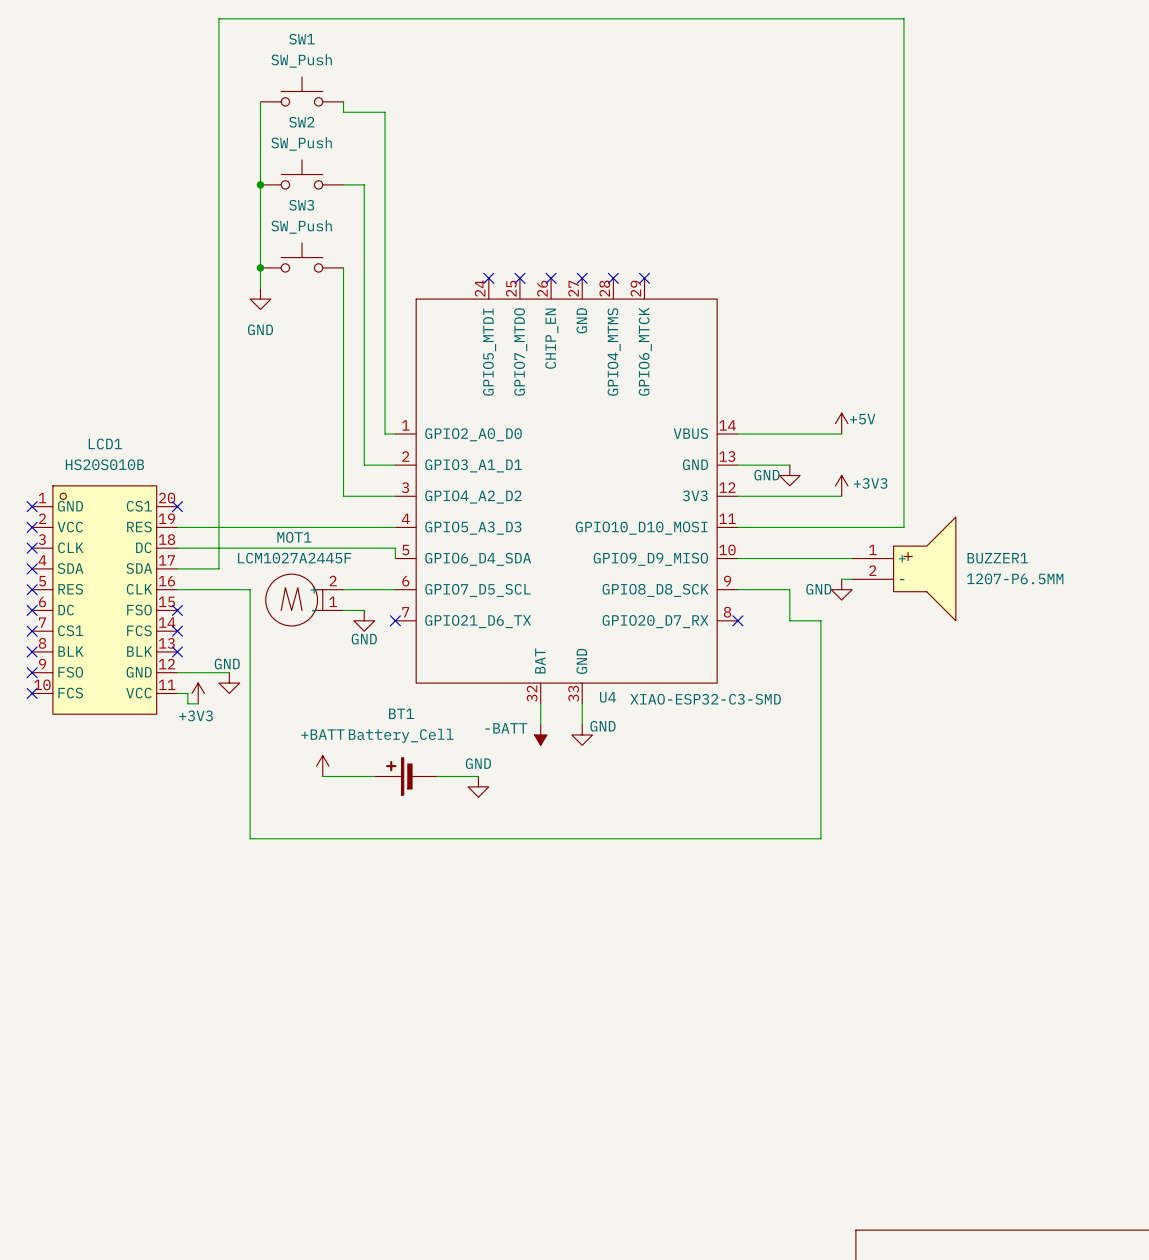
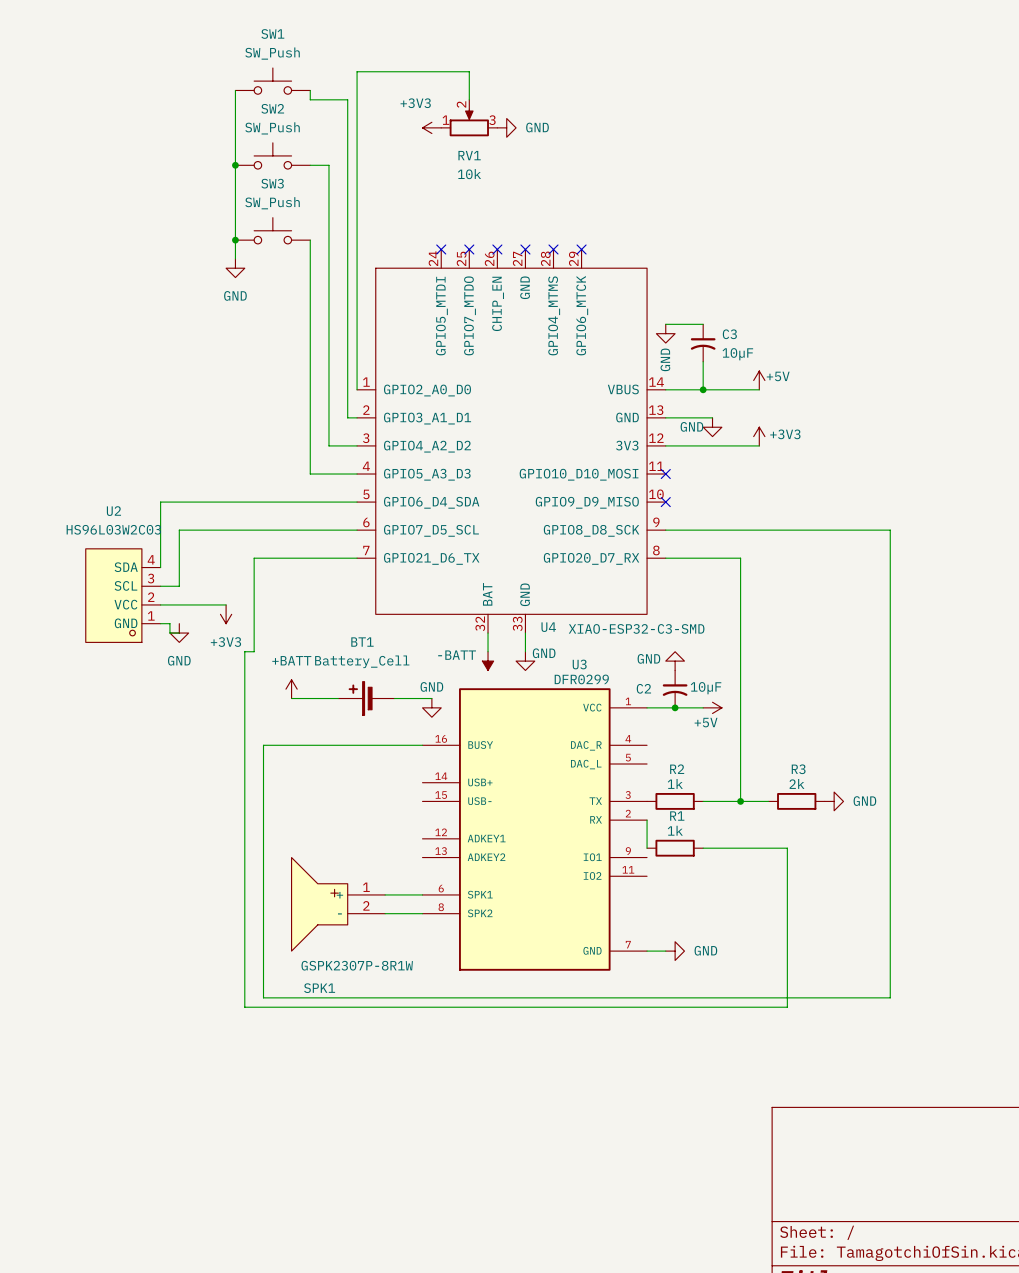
wire: none -> (469, 99) (469, 71) (357, 71) (357, 389)
RV1: none -> 10k (469, 118)
power symbol: none -> +3V3 (431, 127)
power symbol: none -> GND (506, 127)
wire: none -> (665, 324) (703, 324)
power symbol: none -> GND (665, 333)
C3: none -> 10µF (703, 343)
wire: none -> (703, 361) (703, 389)
wire: (385, 433) (395, 433) -> (347, 389) (347, 417)
junction: none -> (703, 389)
wire: (364, 465) (385, 465) -> (328, 417) (328, 445)
wire: (343, 496) (364, 496) -> (310, 445) (310, 474)
no-connect mark: (32, 506) -> none
no-connect mark: (177, 506) -> none
no-connect mark: (32, 527) -> none
wire: (177, 527) (343, 527) -> none
wire: (737, 527) (903, 527) (903, 18) (218, 18) (218, 568) (177, 568) -> none
no-connect mark: none -> (665, 474)
no-connect mark: (32, 548) -> none
wire: (177, 548) (395, 548) (395, 558) -> (160, 567) (160, 502) (357, 502)
wire: (737, 558) (852, 558) -> none
no-connect mark: none -> (665, 502)
no-connect mark: (32, 568) -> none
BUZZER1: 1207-P6.5MM (903, 568) -> none
wire: (841, 579) (852, 579) -> none
no-connect mark: (32, 589) -> none
wire: (177, 589) (198, 589) -> (160, 586) (179, 586) (179, 530)
wire: (250, 589) (250, 838) (820, 838) -> (226, 530) (310, 530)
wire: (789, 589) (789, 620) -> (665, 558) (712, 558)
wire: none -> (712, 530) (890, 530) (890, 997) (263, 997) (263, 745) (422, 745)
power symbol: GND (841, 589) -> none
LCD1: HS20S010B (104, 600) -> none
MOT1: LCM1027A2445F (304, 600) -> none
no-connect mark: (32, 610) -> none
no-connect mark: (177, 610) -> none
wire: (343, 610) (364, 610) -> (207, 604) (226, 604)
power symbol: GND (364, 620) -> none
wire: none -> (357, 558) (254, 558) (254, 651) (244, 651) (244, 1007) (787, 1007) (787, 848) (703, 848)
no-connect mark: (395, 620) -> none
no-connect mark: (737, 620) -> none
no-connect mark: (32, 631) -> none
no-connect mark: (177, 631) -> none
no-connect mark: (32, 651) -> none
no-connect mark: (177, 651) -> none
U2: none -> HS96L03W2C03 (123, 595)
power symbol text position: GND (227, 664) -> GND (179, 660)
no-connect mark: (32, 672) -> none
power symbol position: GND (229, 683) -> GND (179, 633)
no-connect mark: (32, 693) -> none
power symbol rotation: 0° (198, 693) -> 180° (226, 614)
power symbol position: +3V3 (198, 693) -> +3V3 (226, 614)
power symbol: none -> GND (675, 661)
C2: none -> 10µF (675, 689)
wire: none -> (647, 707) (703, 707)
junction: none -> (675, 707)
power symbol: none -> +5V (712, 707)
wire: none -> (740, 754) (740, 801)
R2: none -> 1k (675, 801)
wire: none -> (703, 801) (768, 801)
junction: none -> (740, 801)
R3: none -> 2k (796, 801)
power symbol: none -> GND (834, 801)
wire: none -> (647, 820) (647, 848)
U3: none -> DFR0299 (534, 829)
R1: none -> 1k (675, 848)
wire: none -> (385, 894) (422, 894)
SPK1: none -> GSPK2307P-8R1W (338, 904)
wire: none -> (385, 913) (422, 913)
wire: none -> (647, 951) (665, 951)
power symbol: none -> GND (675, 951)

